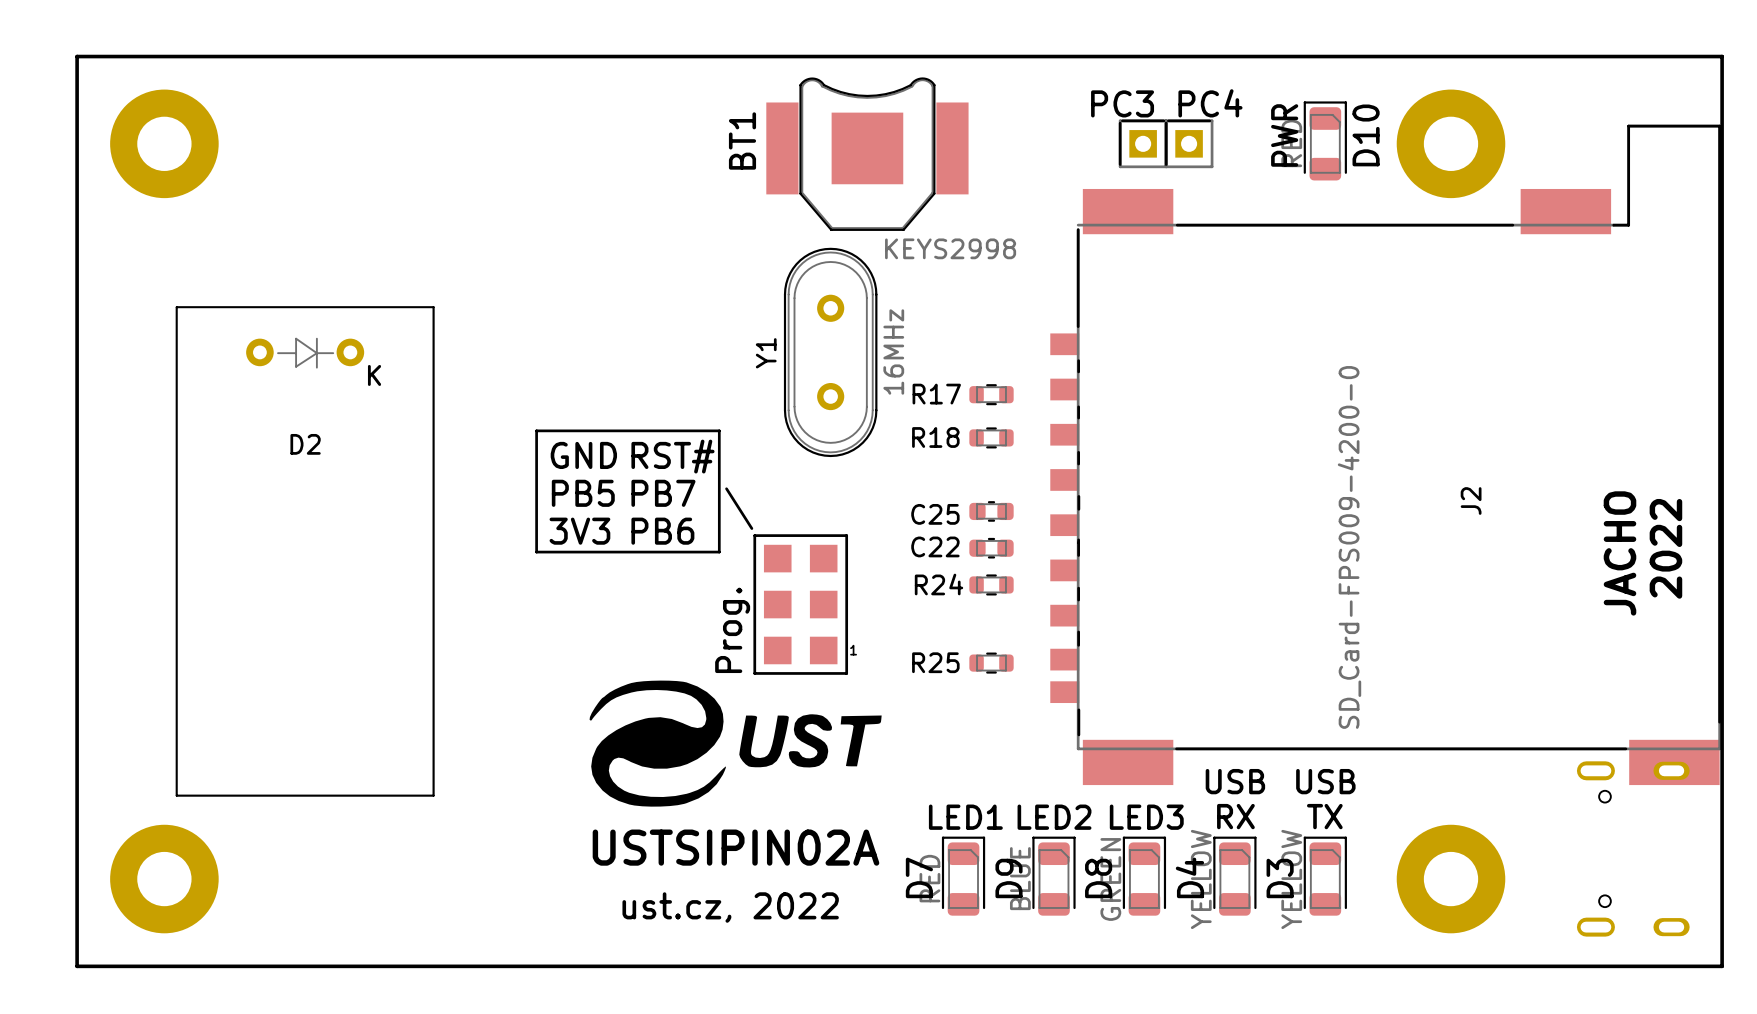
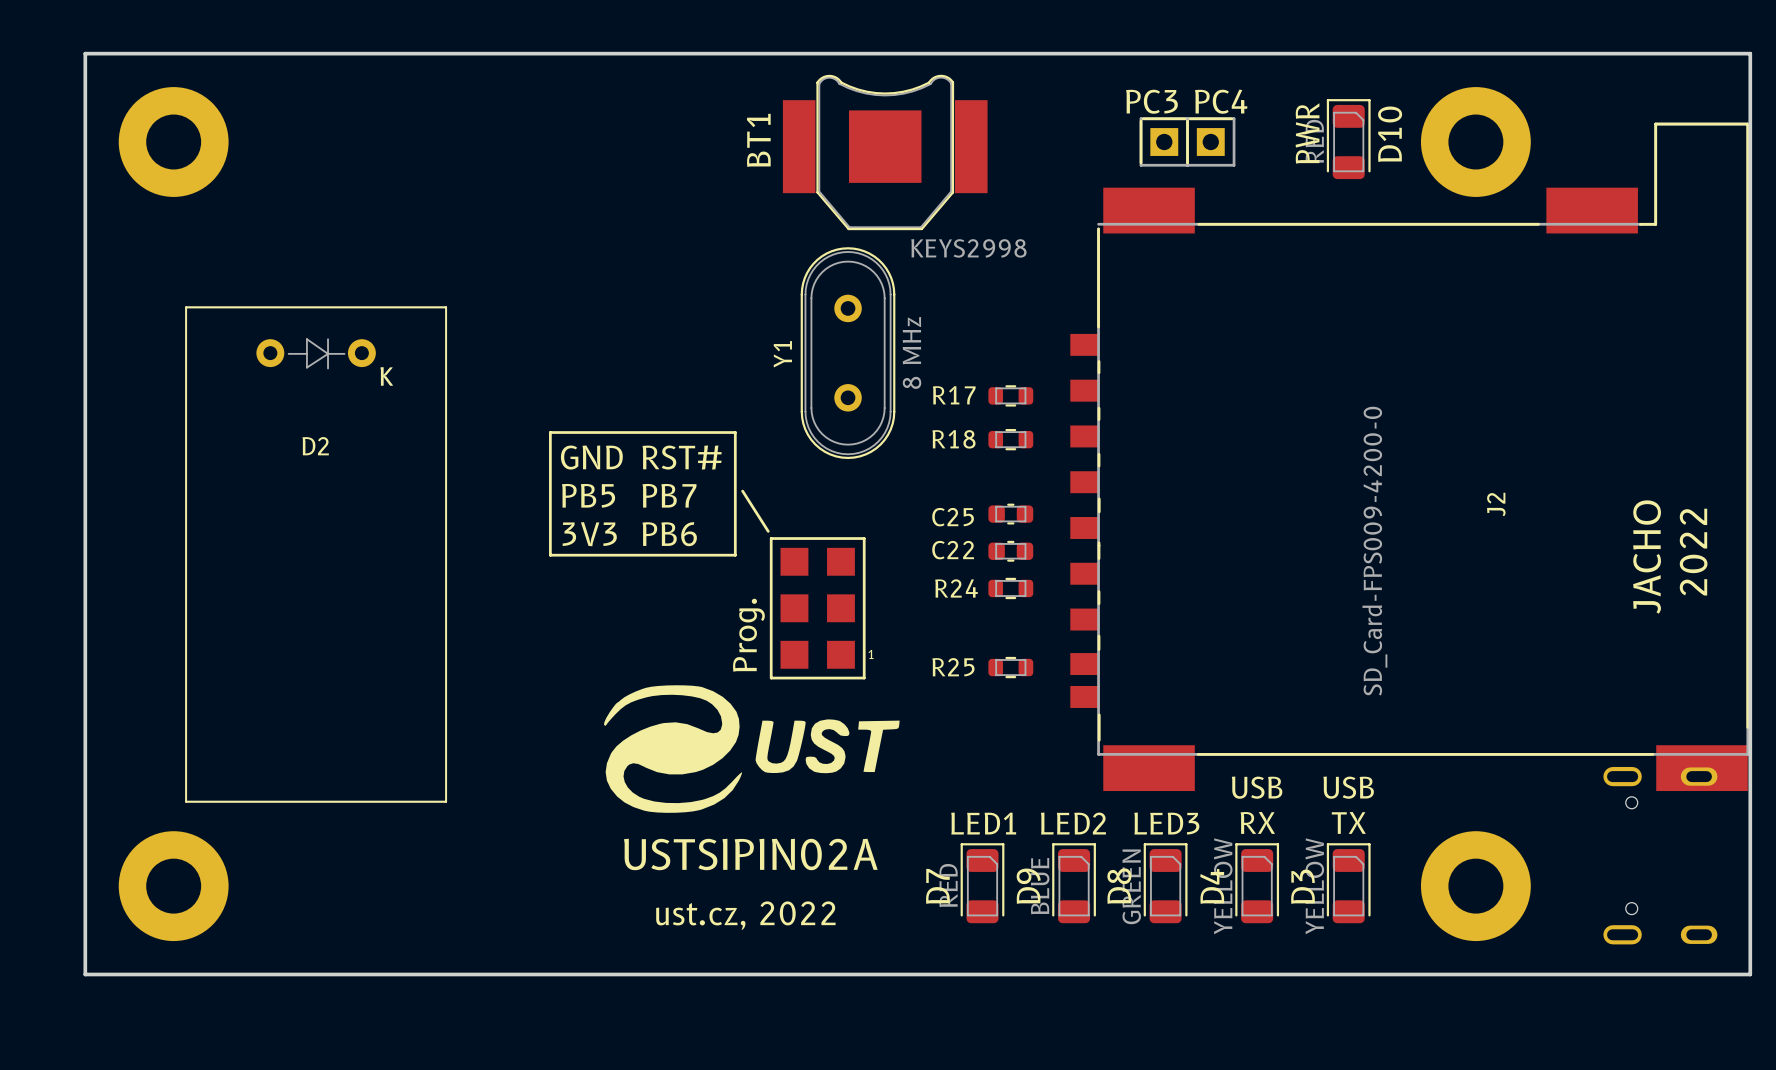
Y1 value: 16MHz (893, 351) -> 8 MHz (911, 352)

